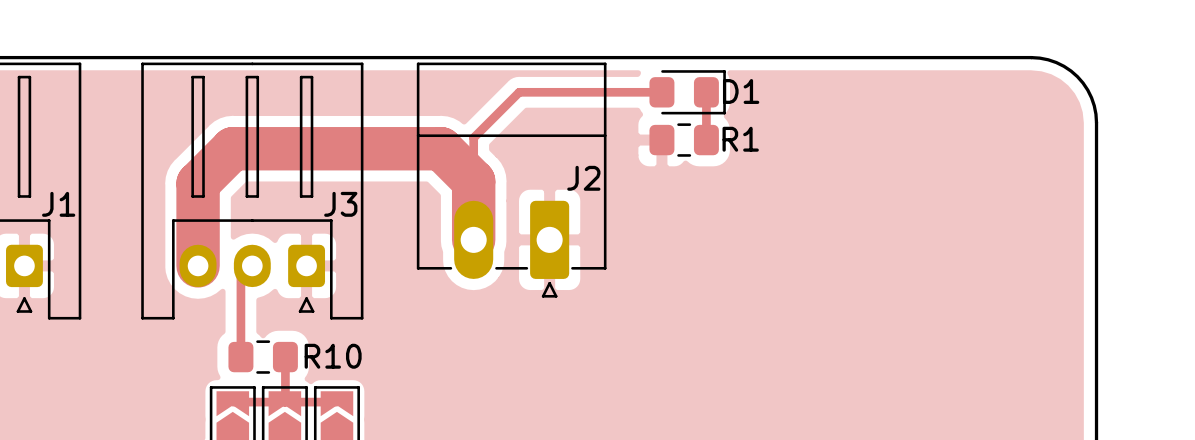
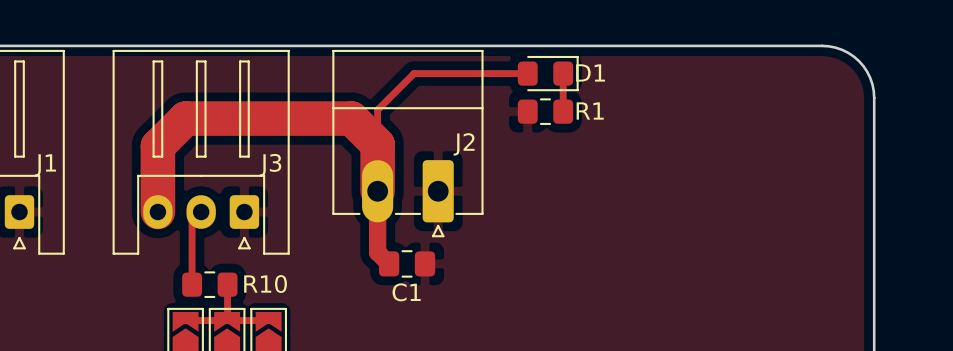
track: none -> (377, 191) (377, 252) (389, 263)
C1: none -> (407, 263)

